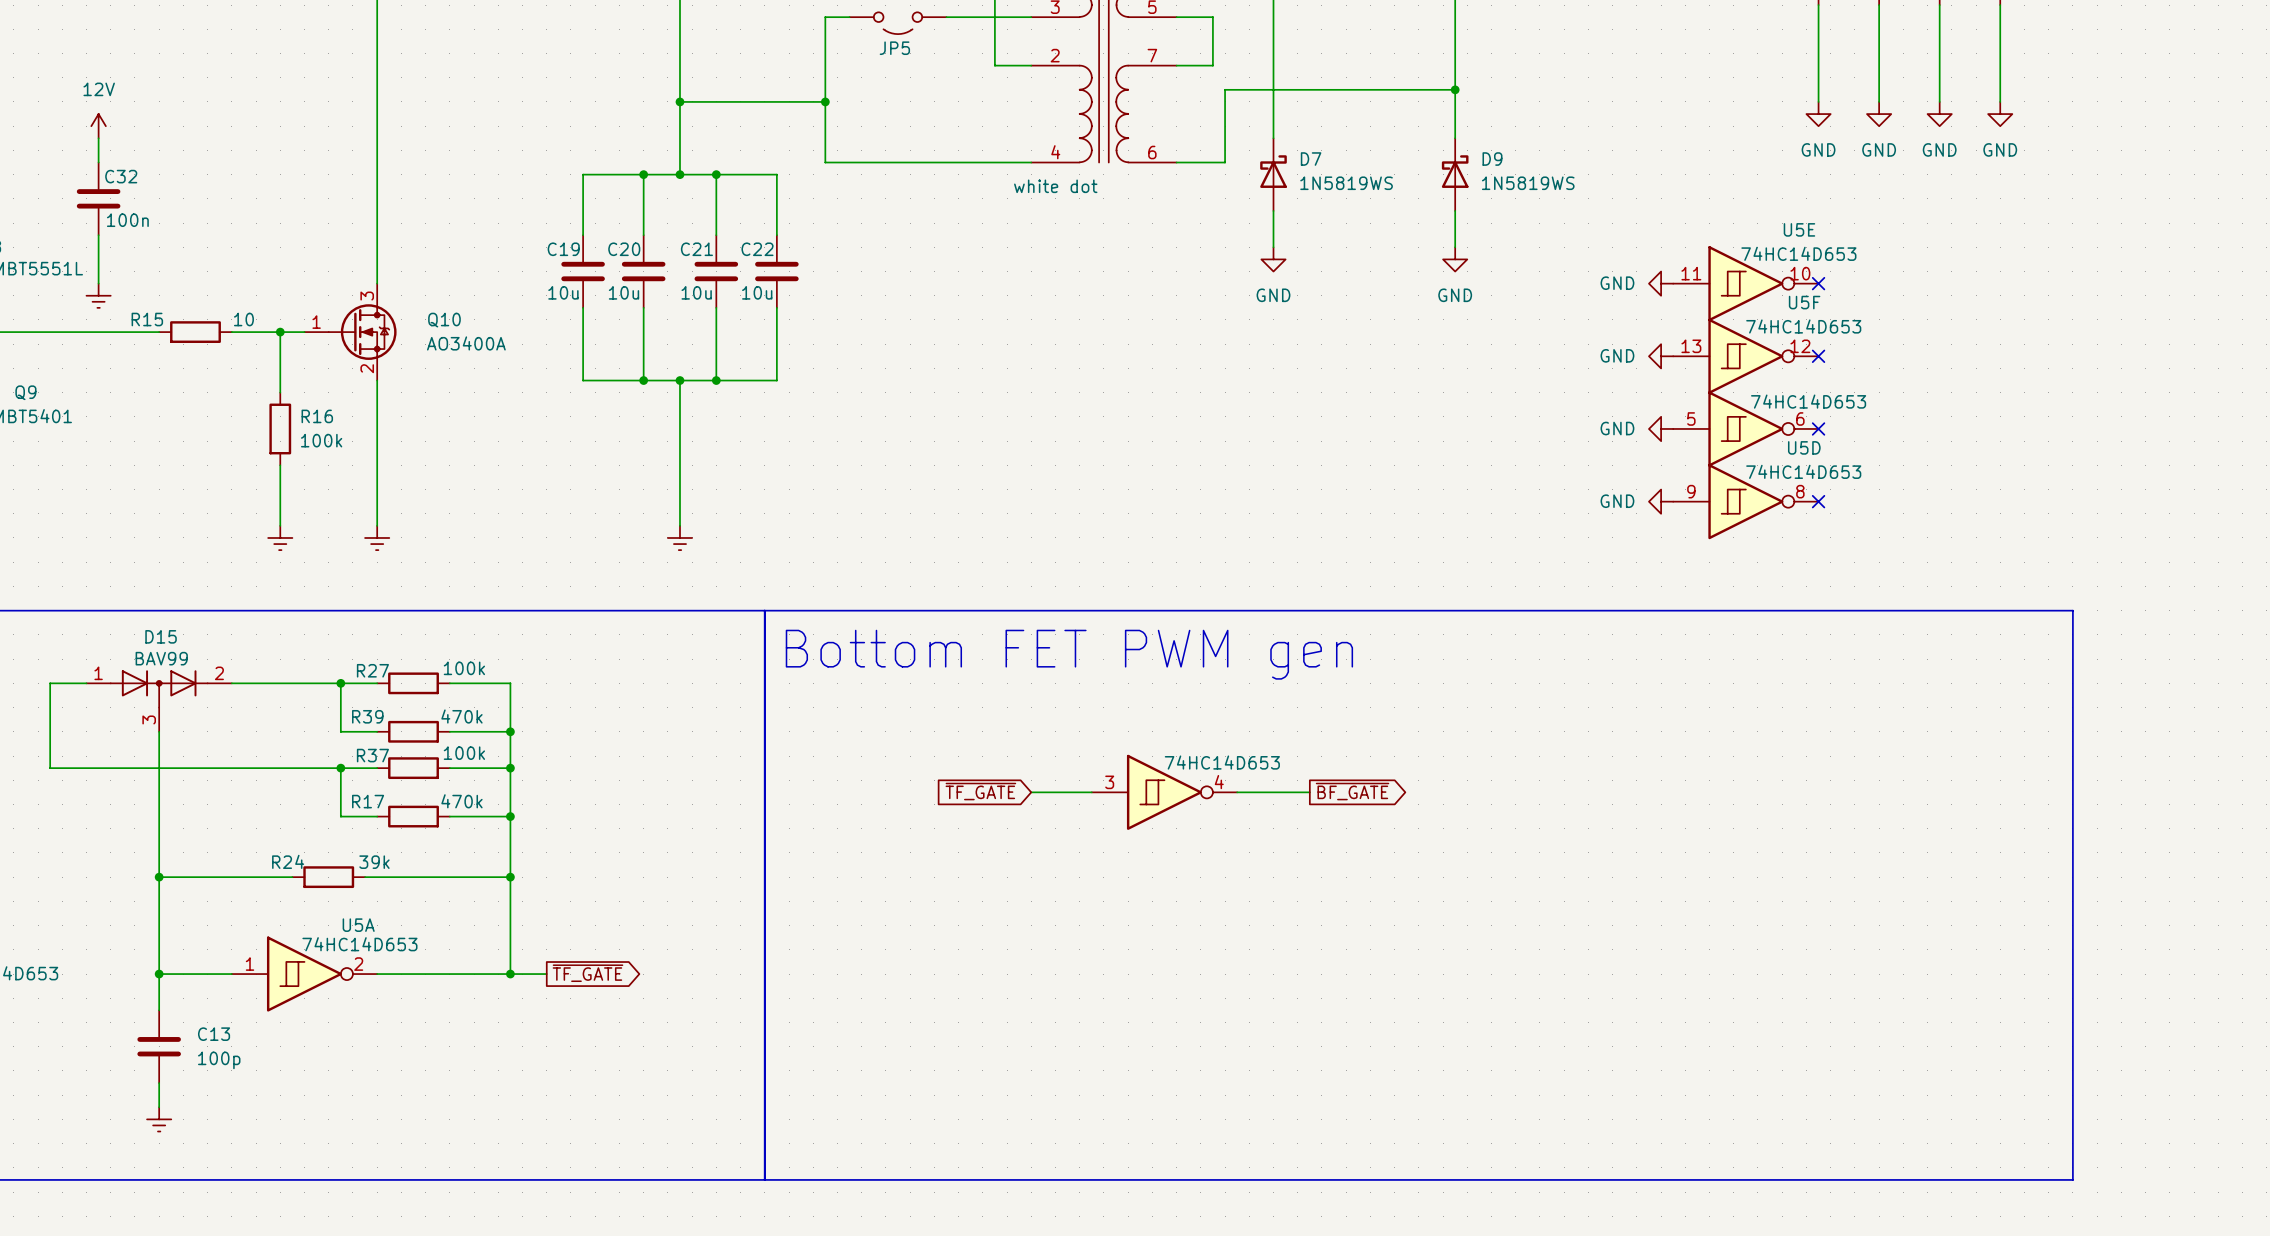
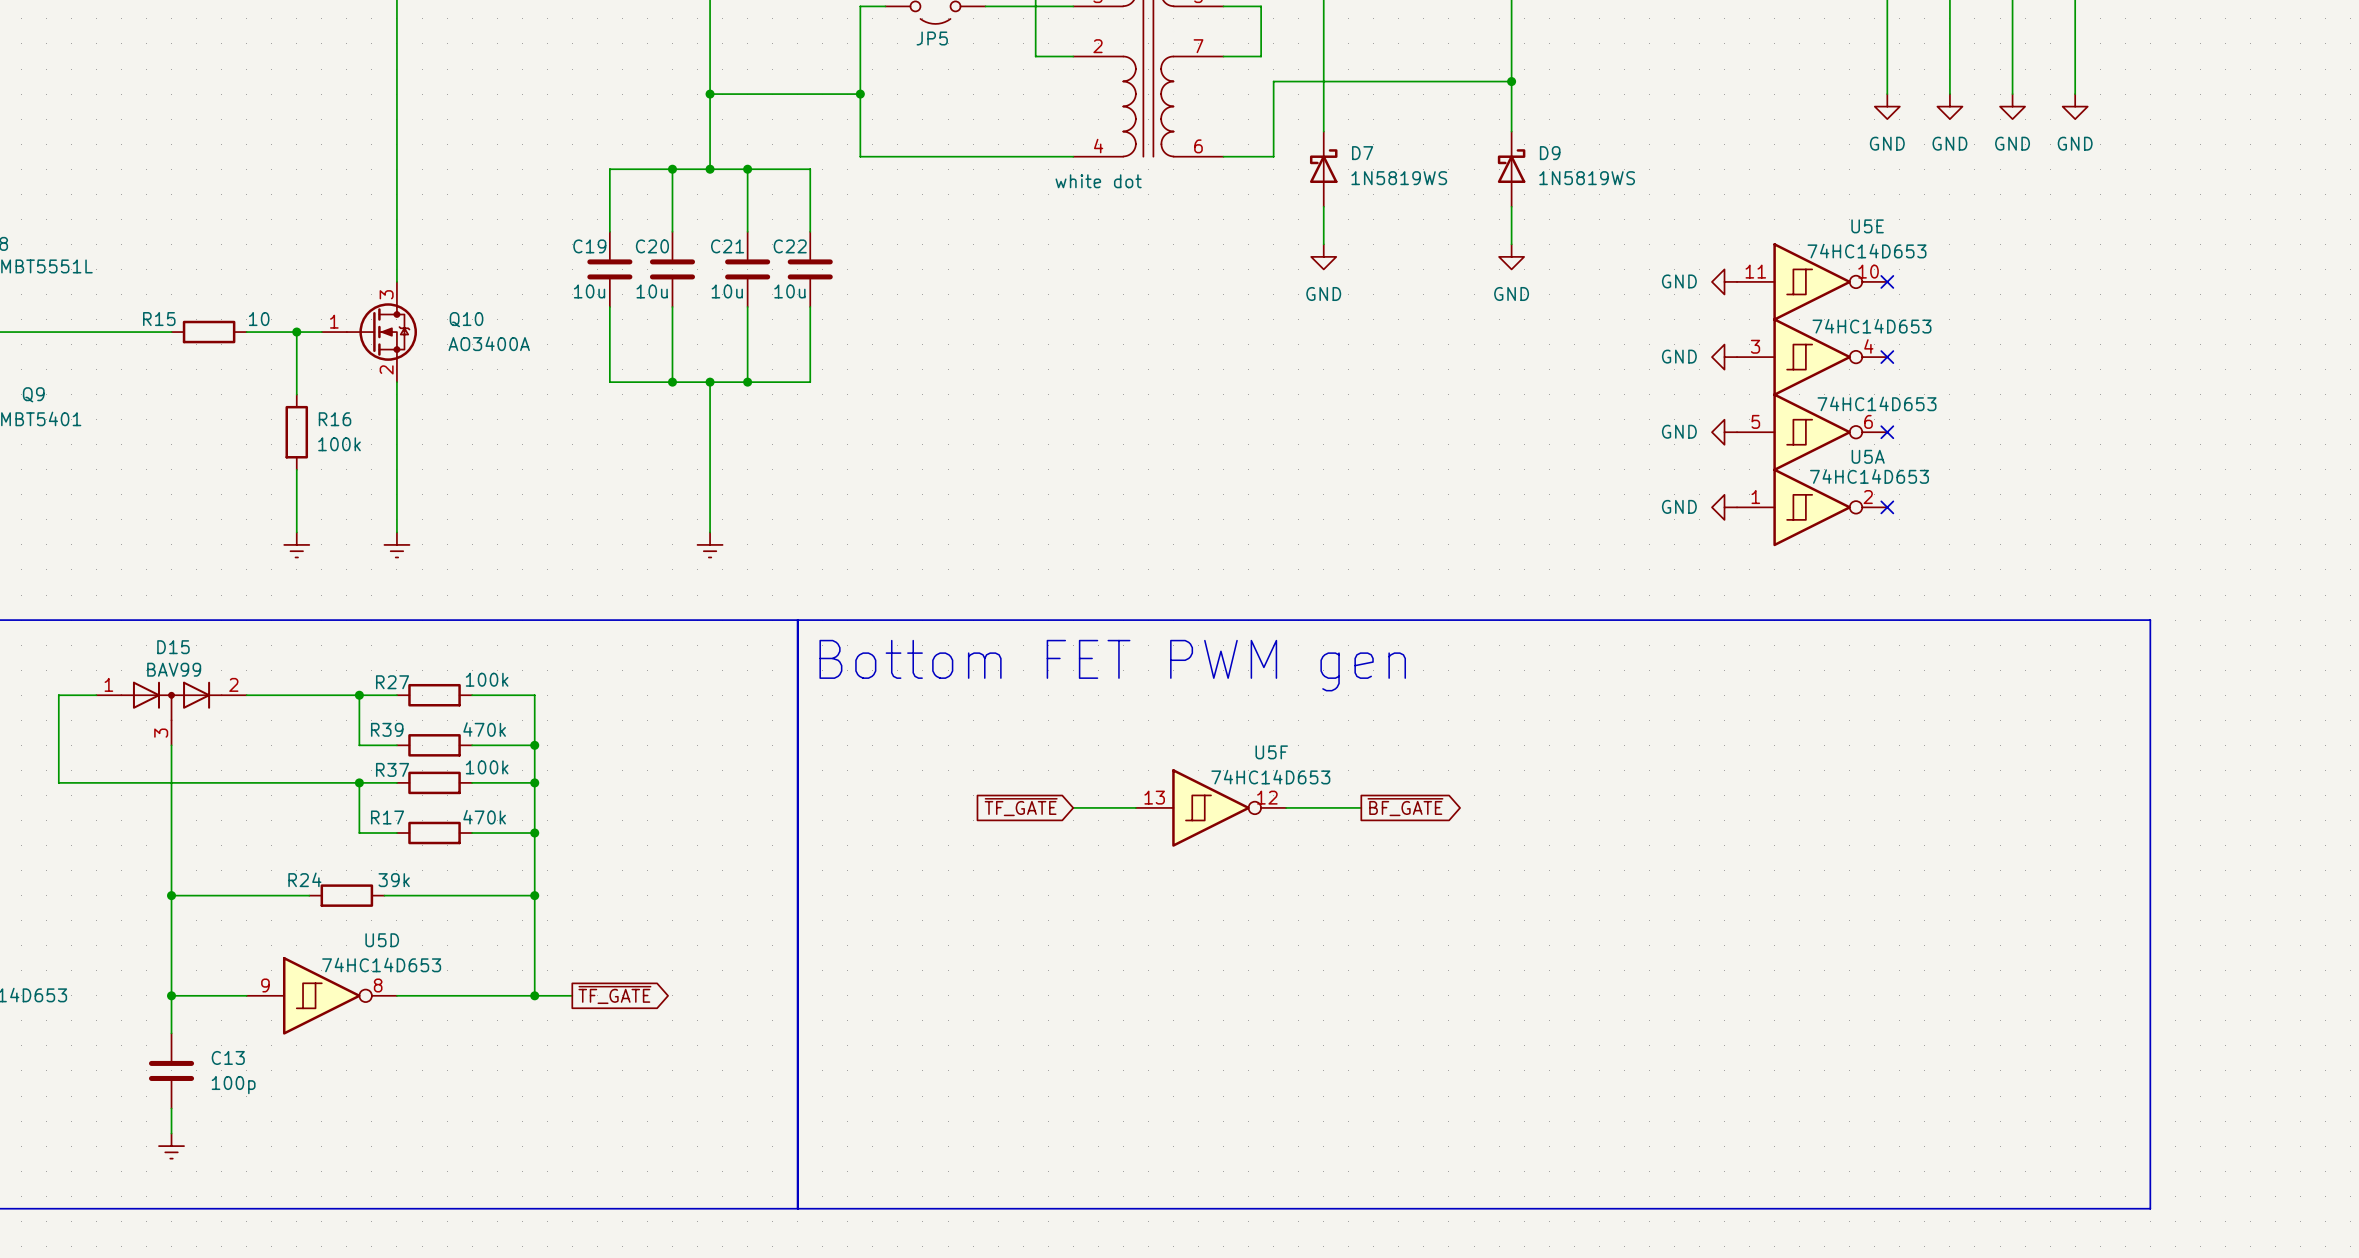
power symbol: 12V (98, 126) -> none
wire: (98, 138) (98, 162) -> none
C32: 100n (98, 198) -> none
wire: (98, 235) (98, 283) -> none
power symbol: (98, 295) -> none
U5F position: (1745, 356) -> (1211, 807)
part: none -> 74HC14D653 (1812, 357)
U5D position: (1745, 501) -> (321, 995)
part: 74HC14D653 (1164, 792) -> none
U5A position: (304, 974) -> (1812, 507)

